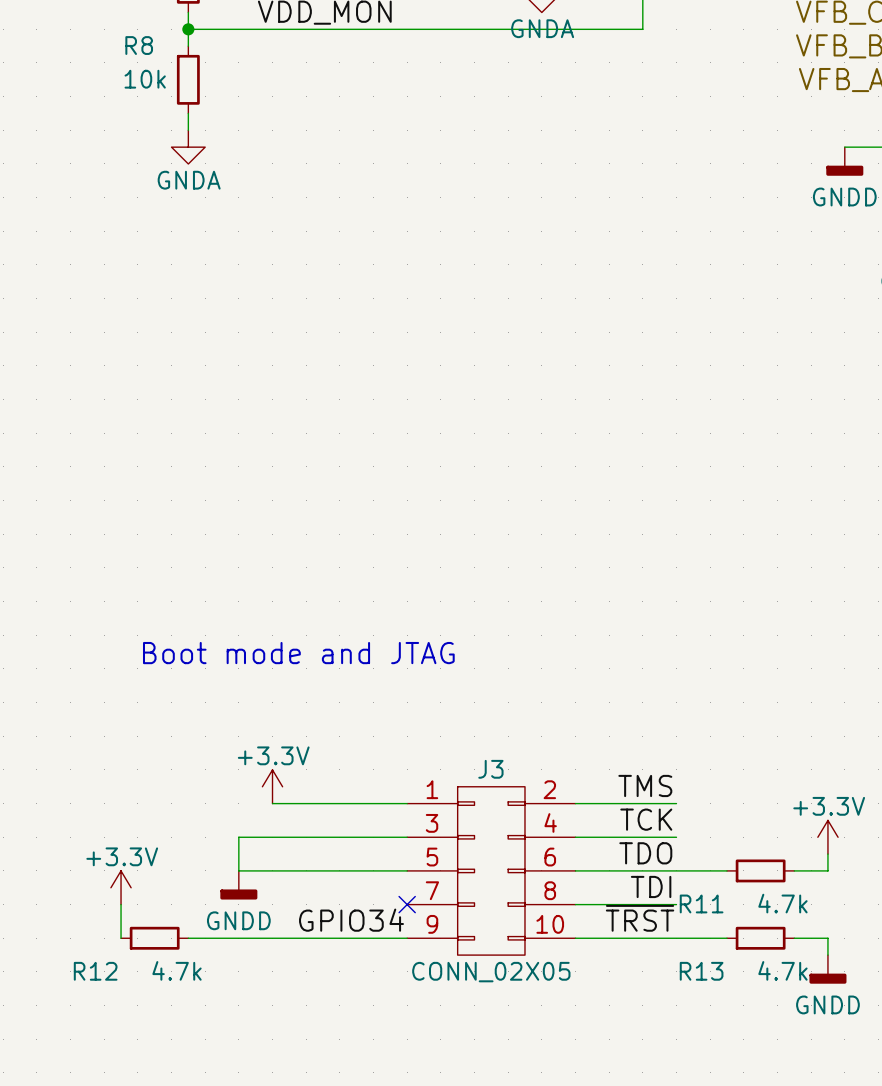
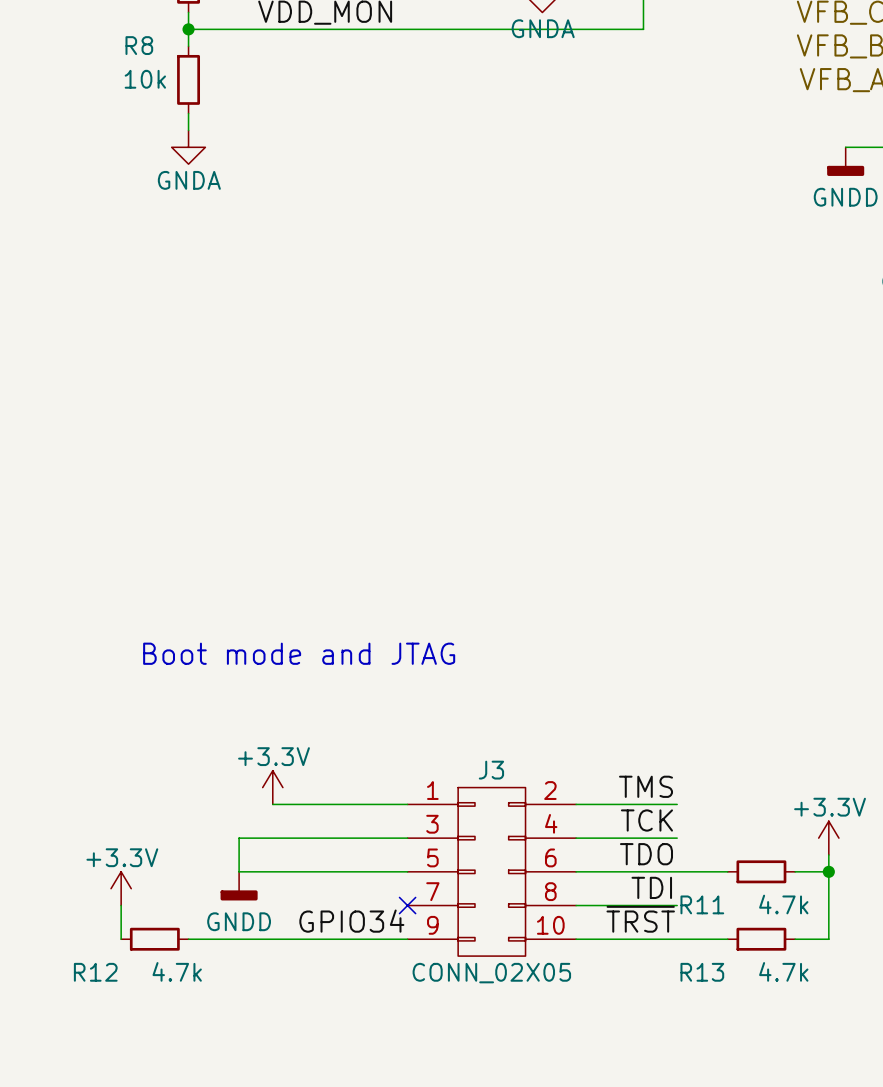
junction: none -> (828, 871)
wire: (827, 938) (827, 955) -> (828, 939) (828, 871)
power symbol: GNDD (827, 969) -> none

